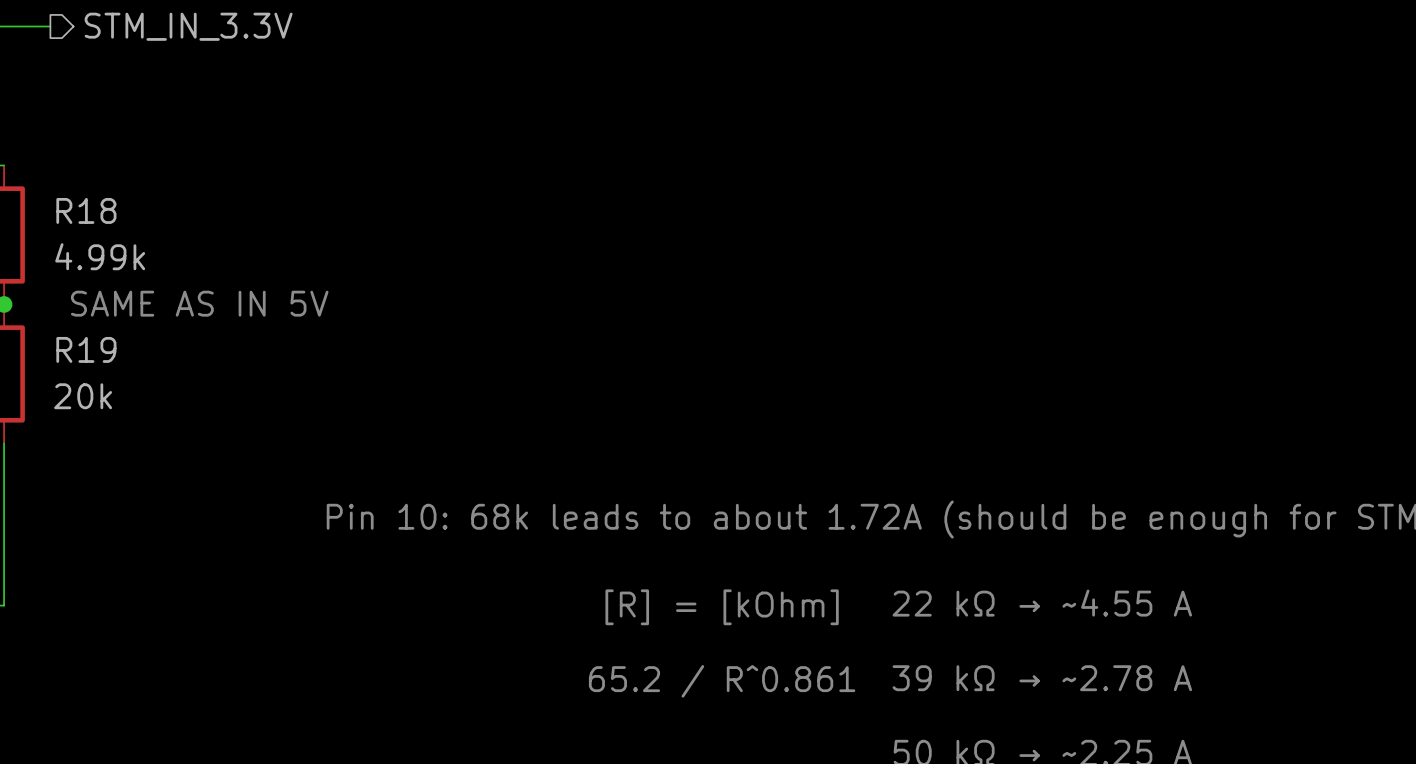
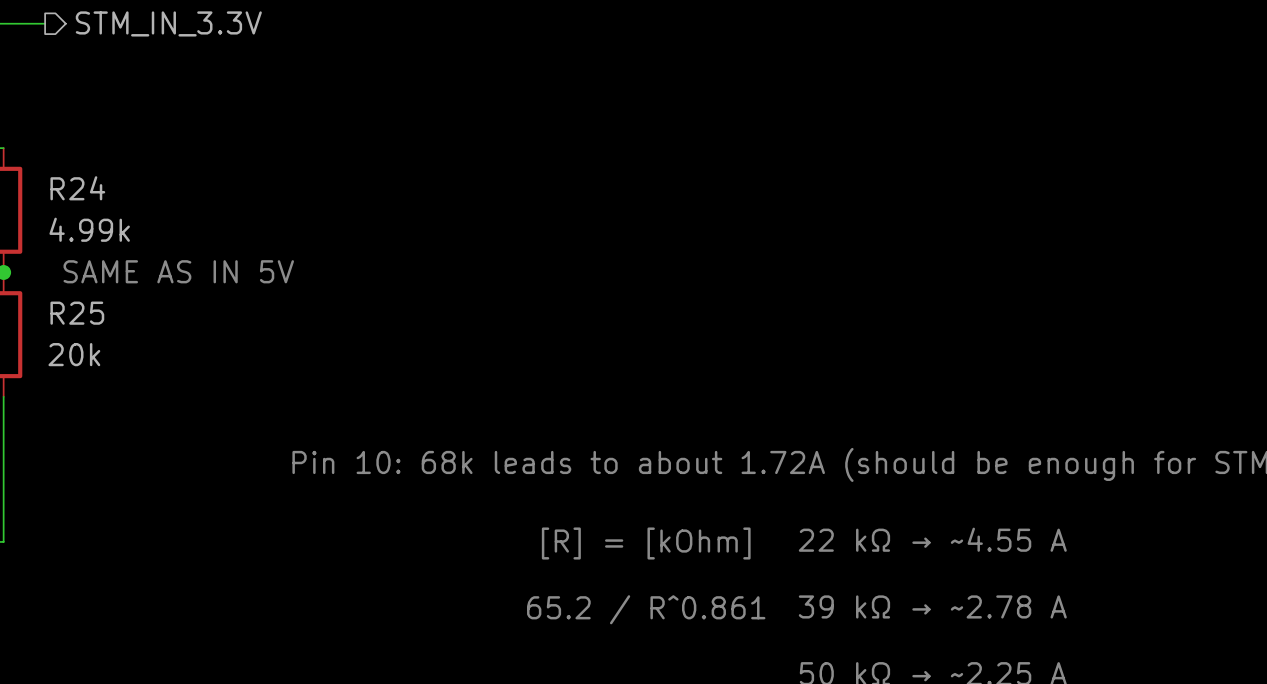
R18 name: R18 (86, 210) -> R24 (77, 188)
R19 name: R19 (86, 349) -> R25 (77, 313)

